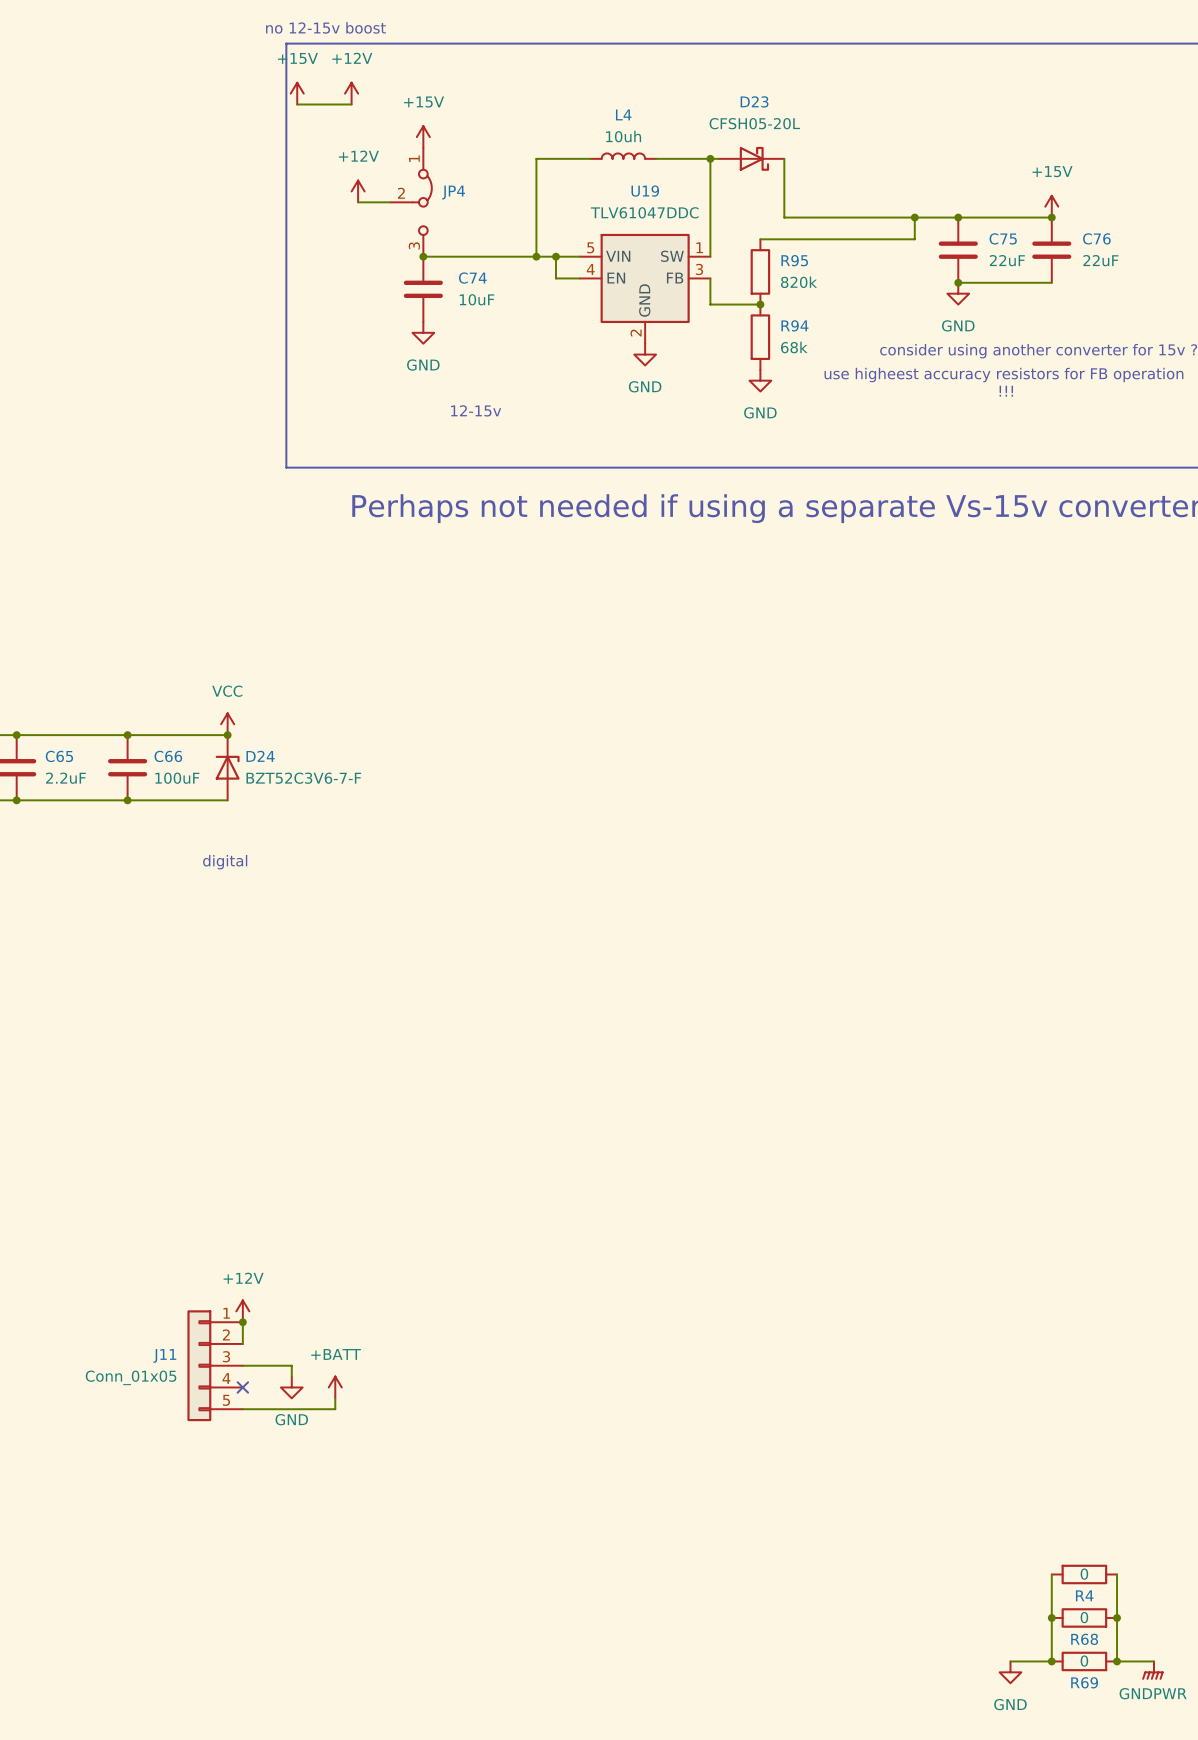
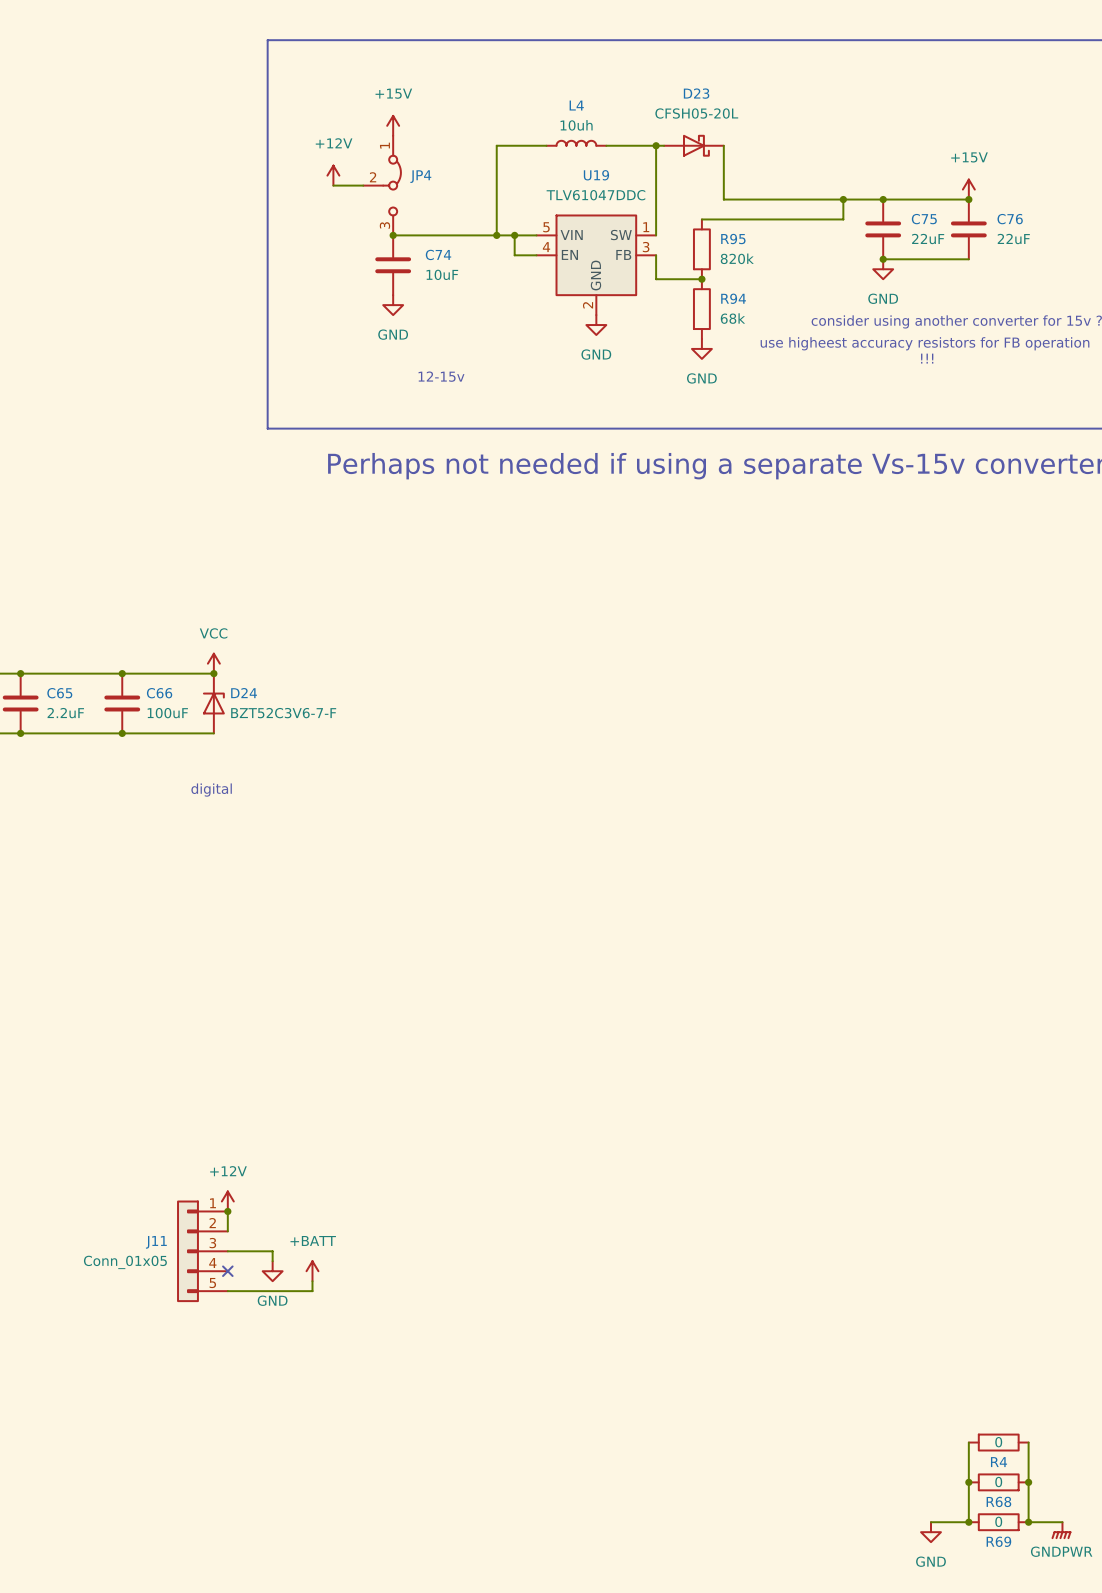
text: no 12-15v boost (325, 27) -> none
power symbol: +15V (297, 93) -> none
power symbol: +12V (351, 93) -> none
wire: (297, 104) (351, 104) -> none

